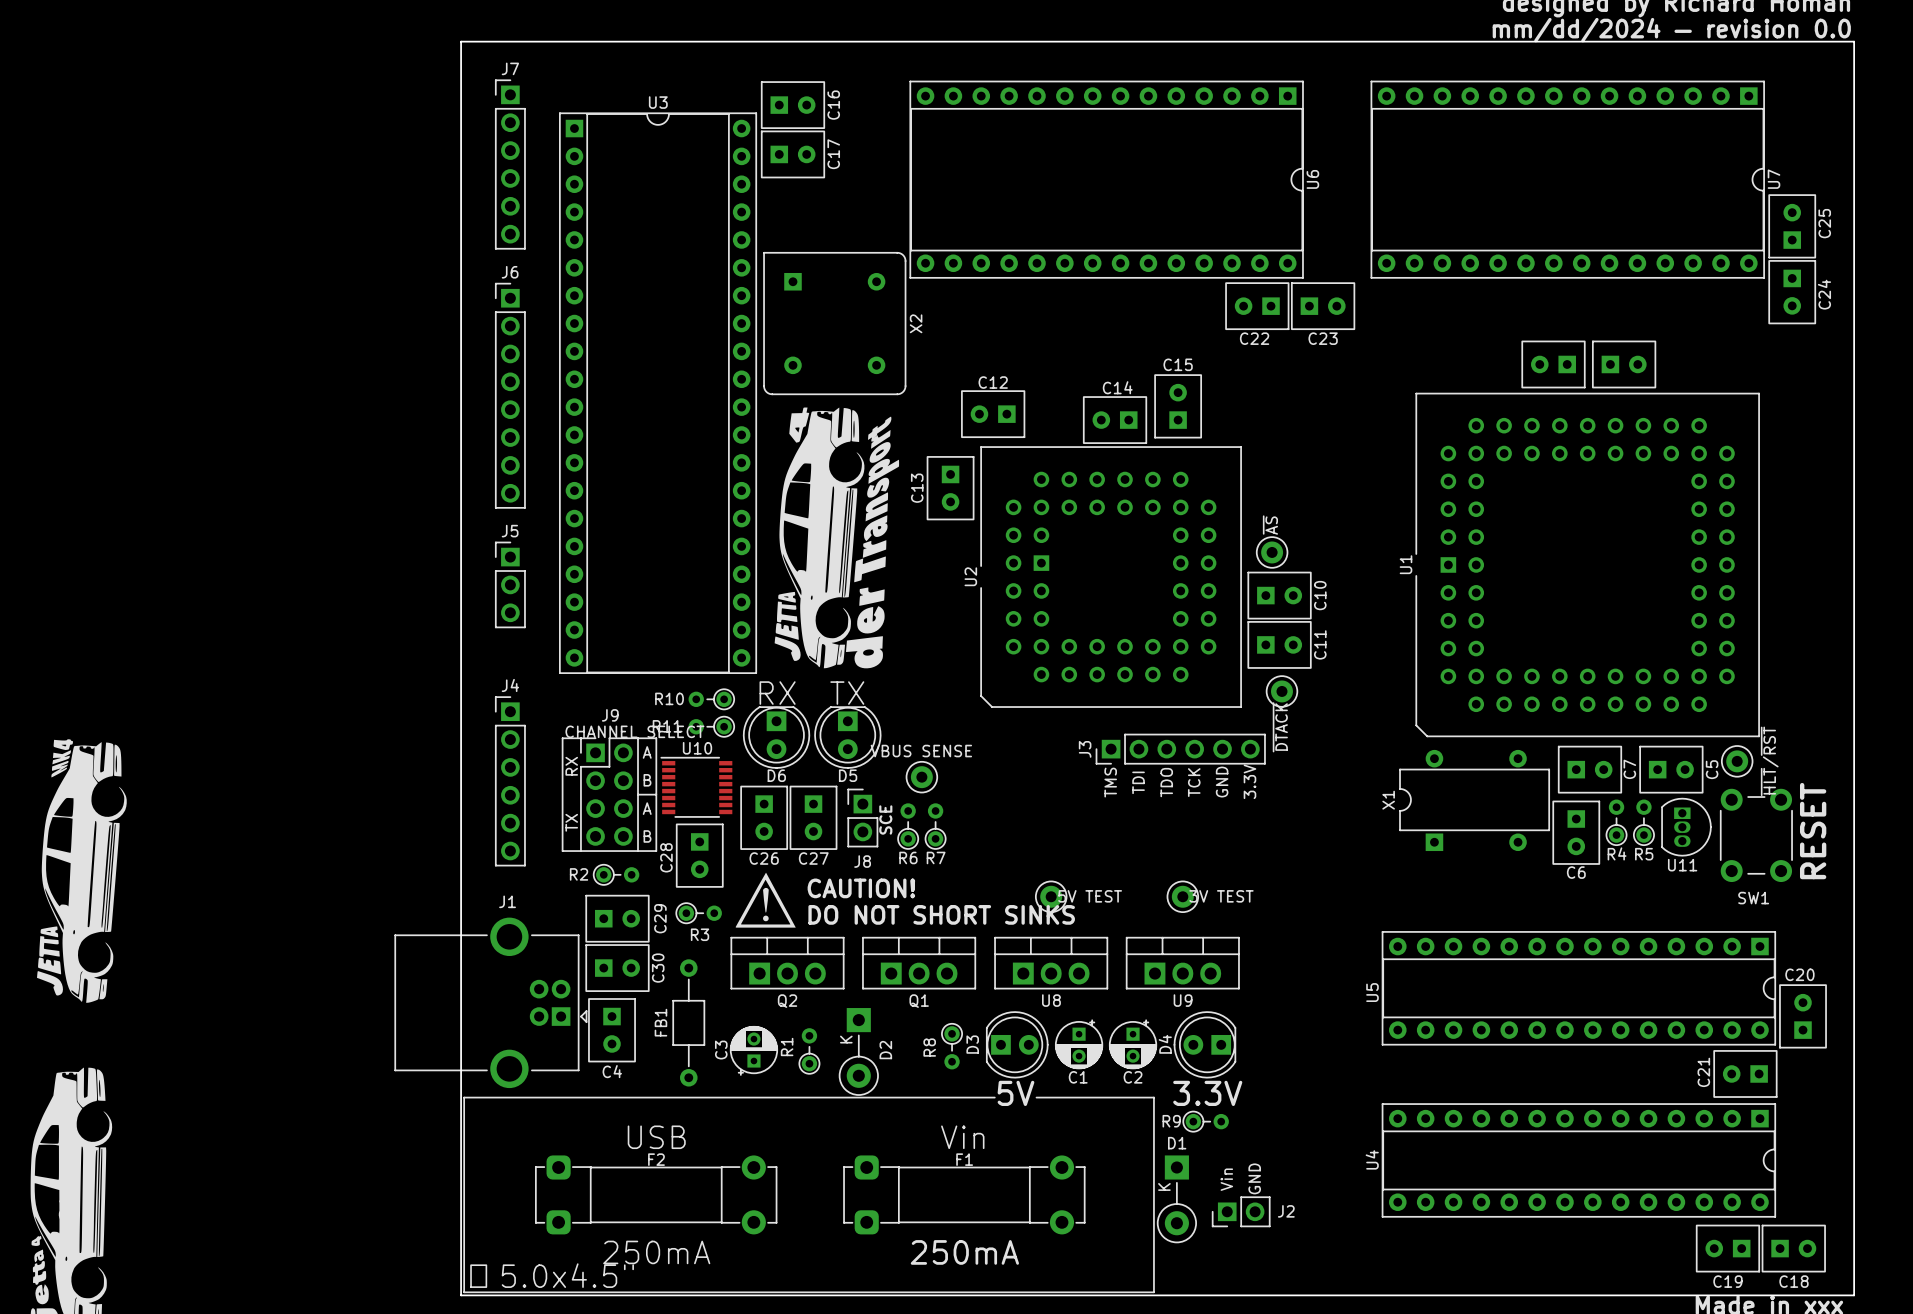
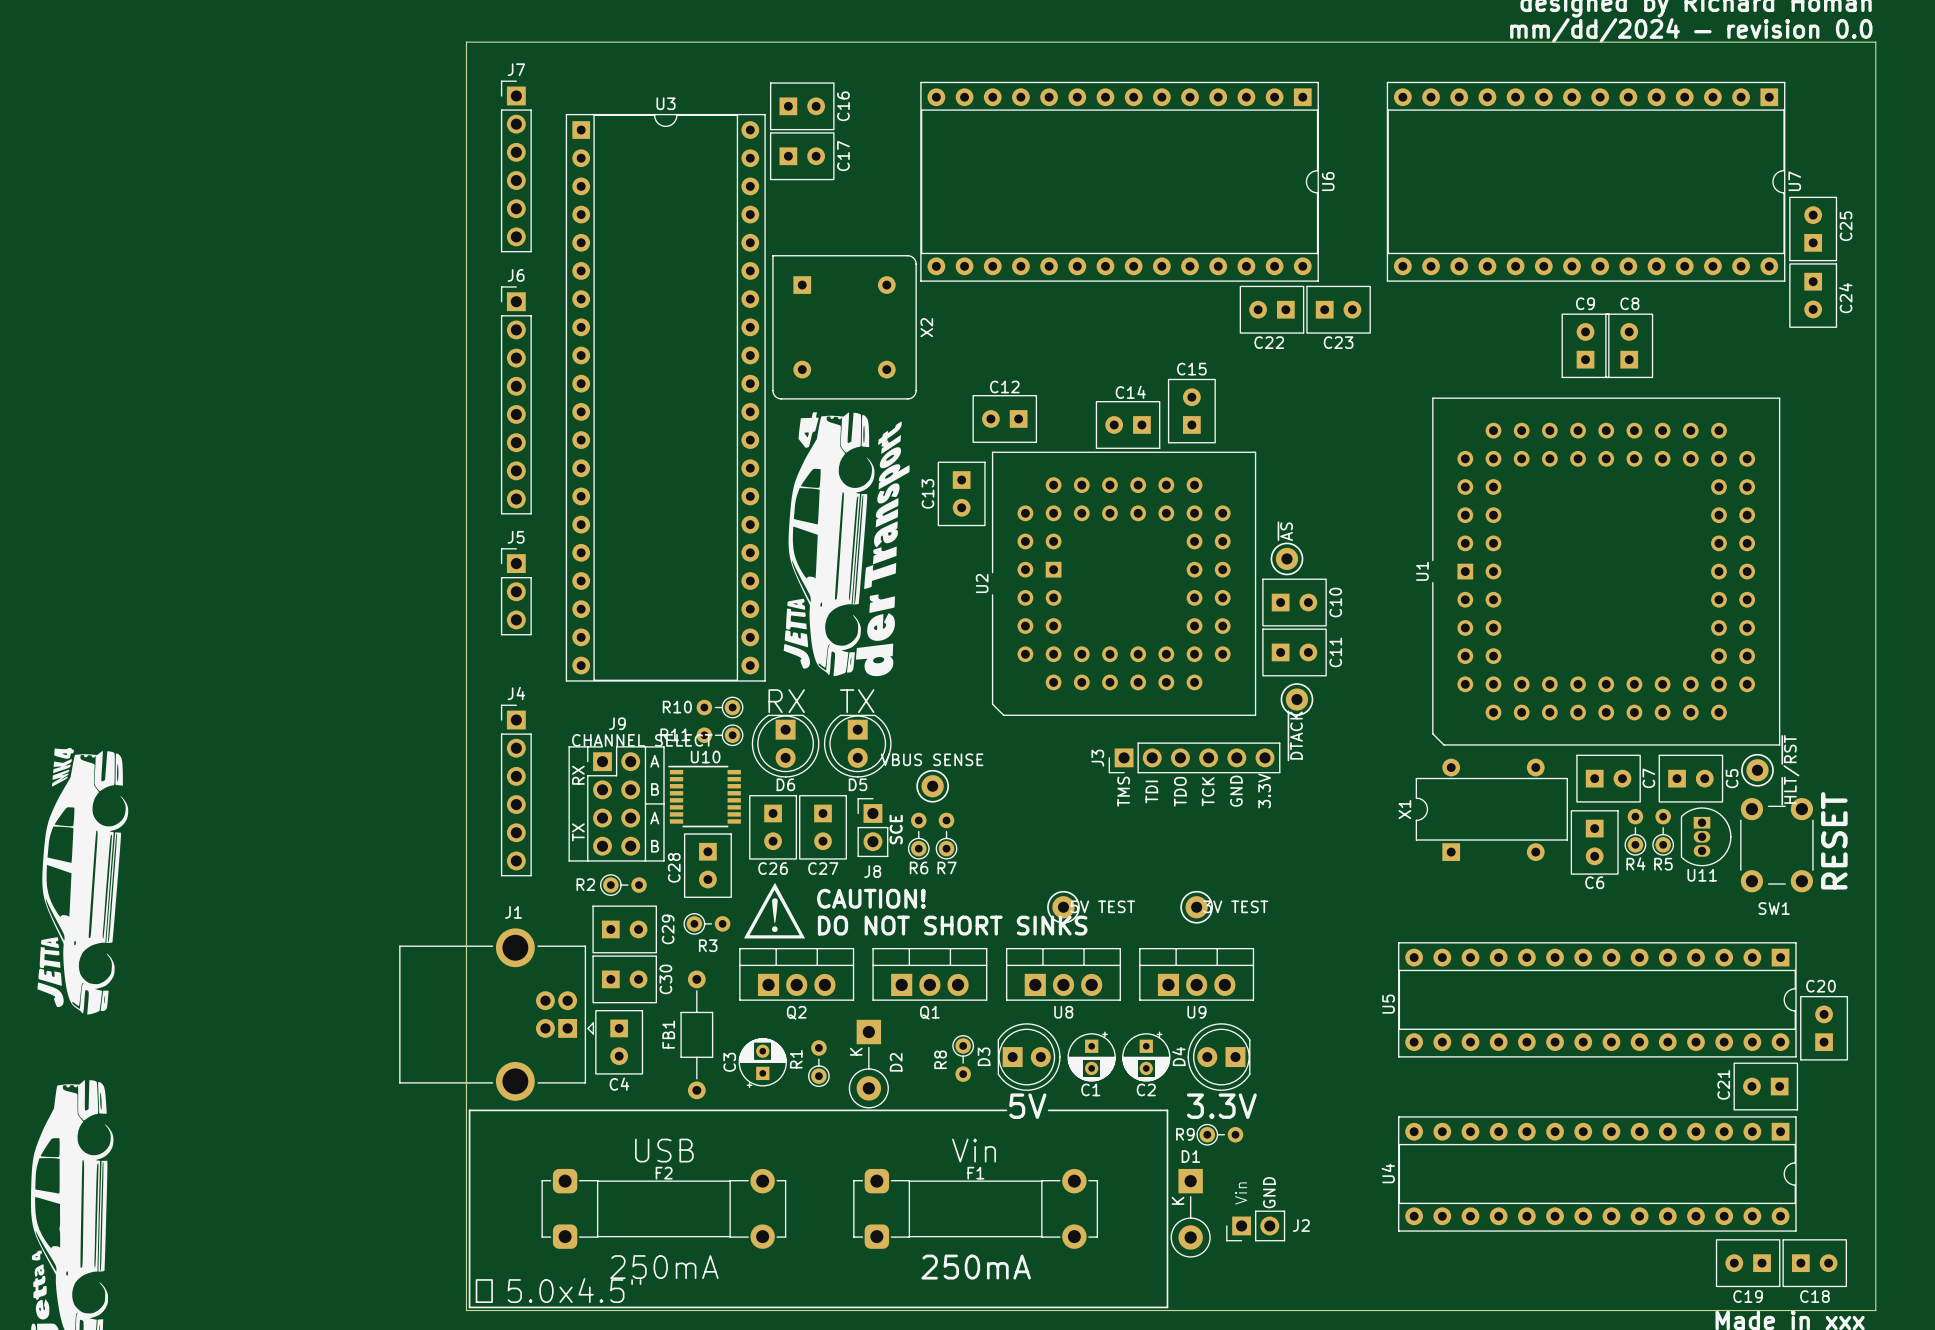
C9: none -> (1585, 345)
C8: none -> (1629, 345)
part: (1553, 364) -> none
part: (1624, 364) -> none

